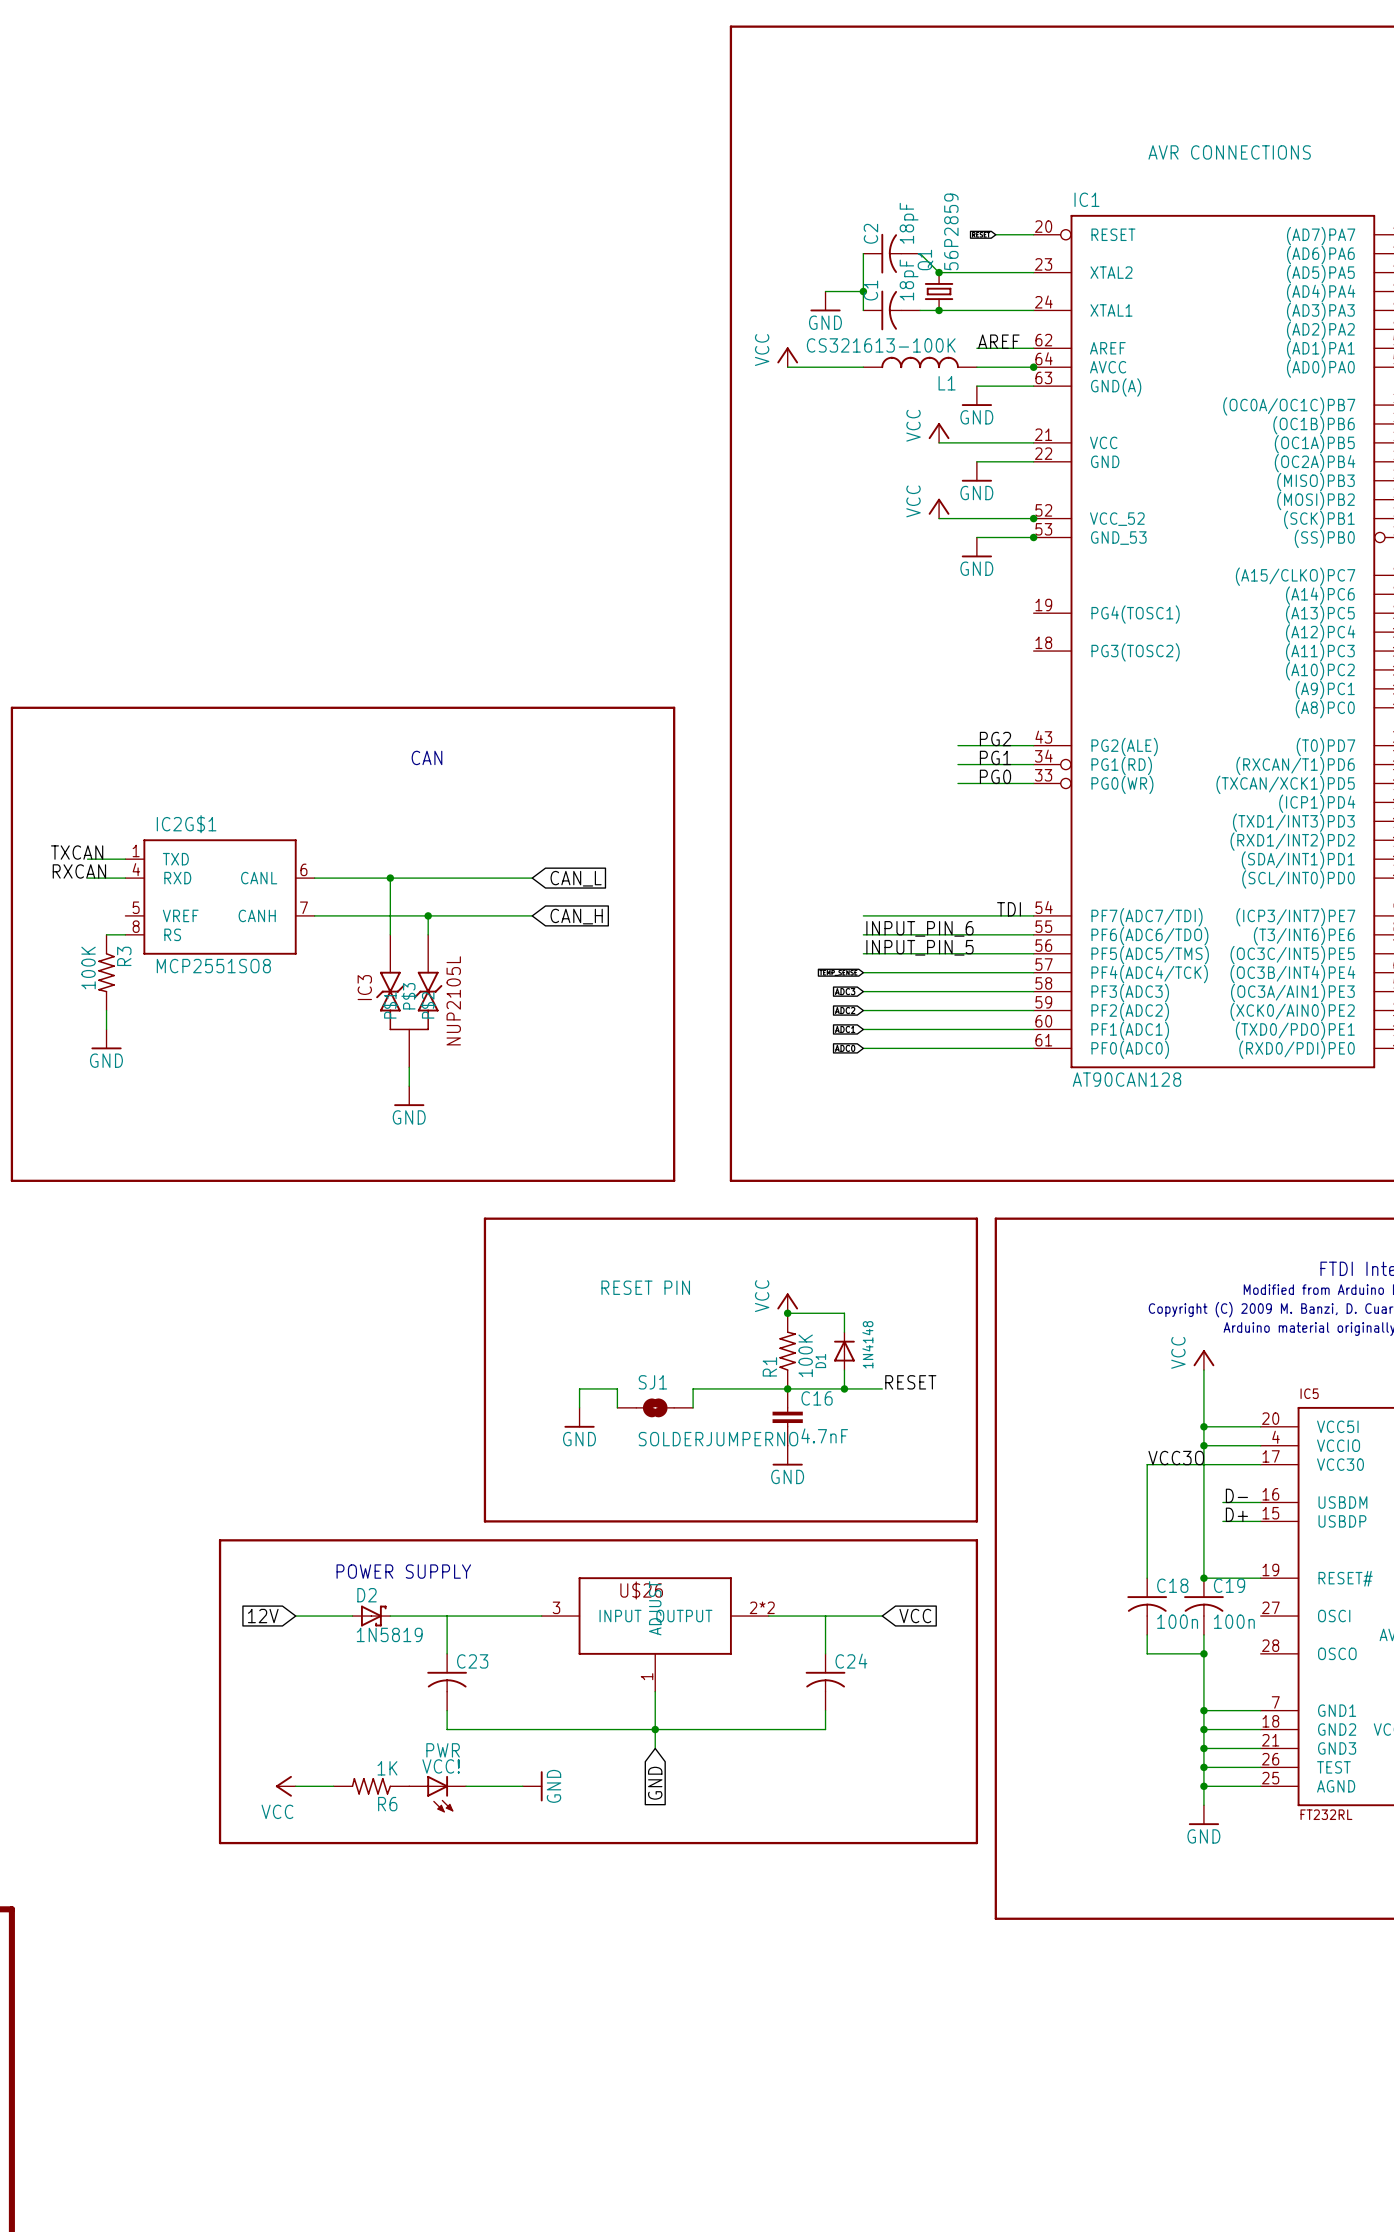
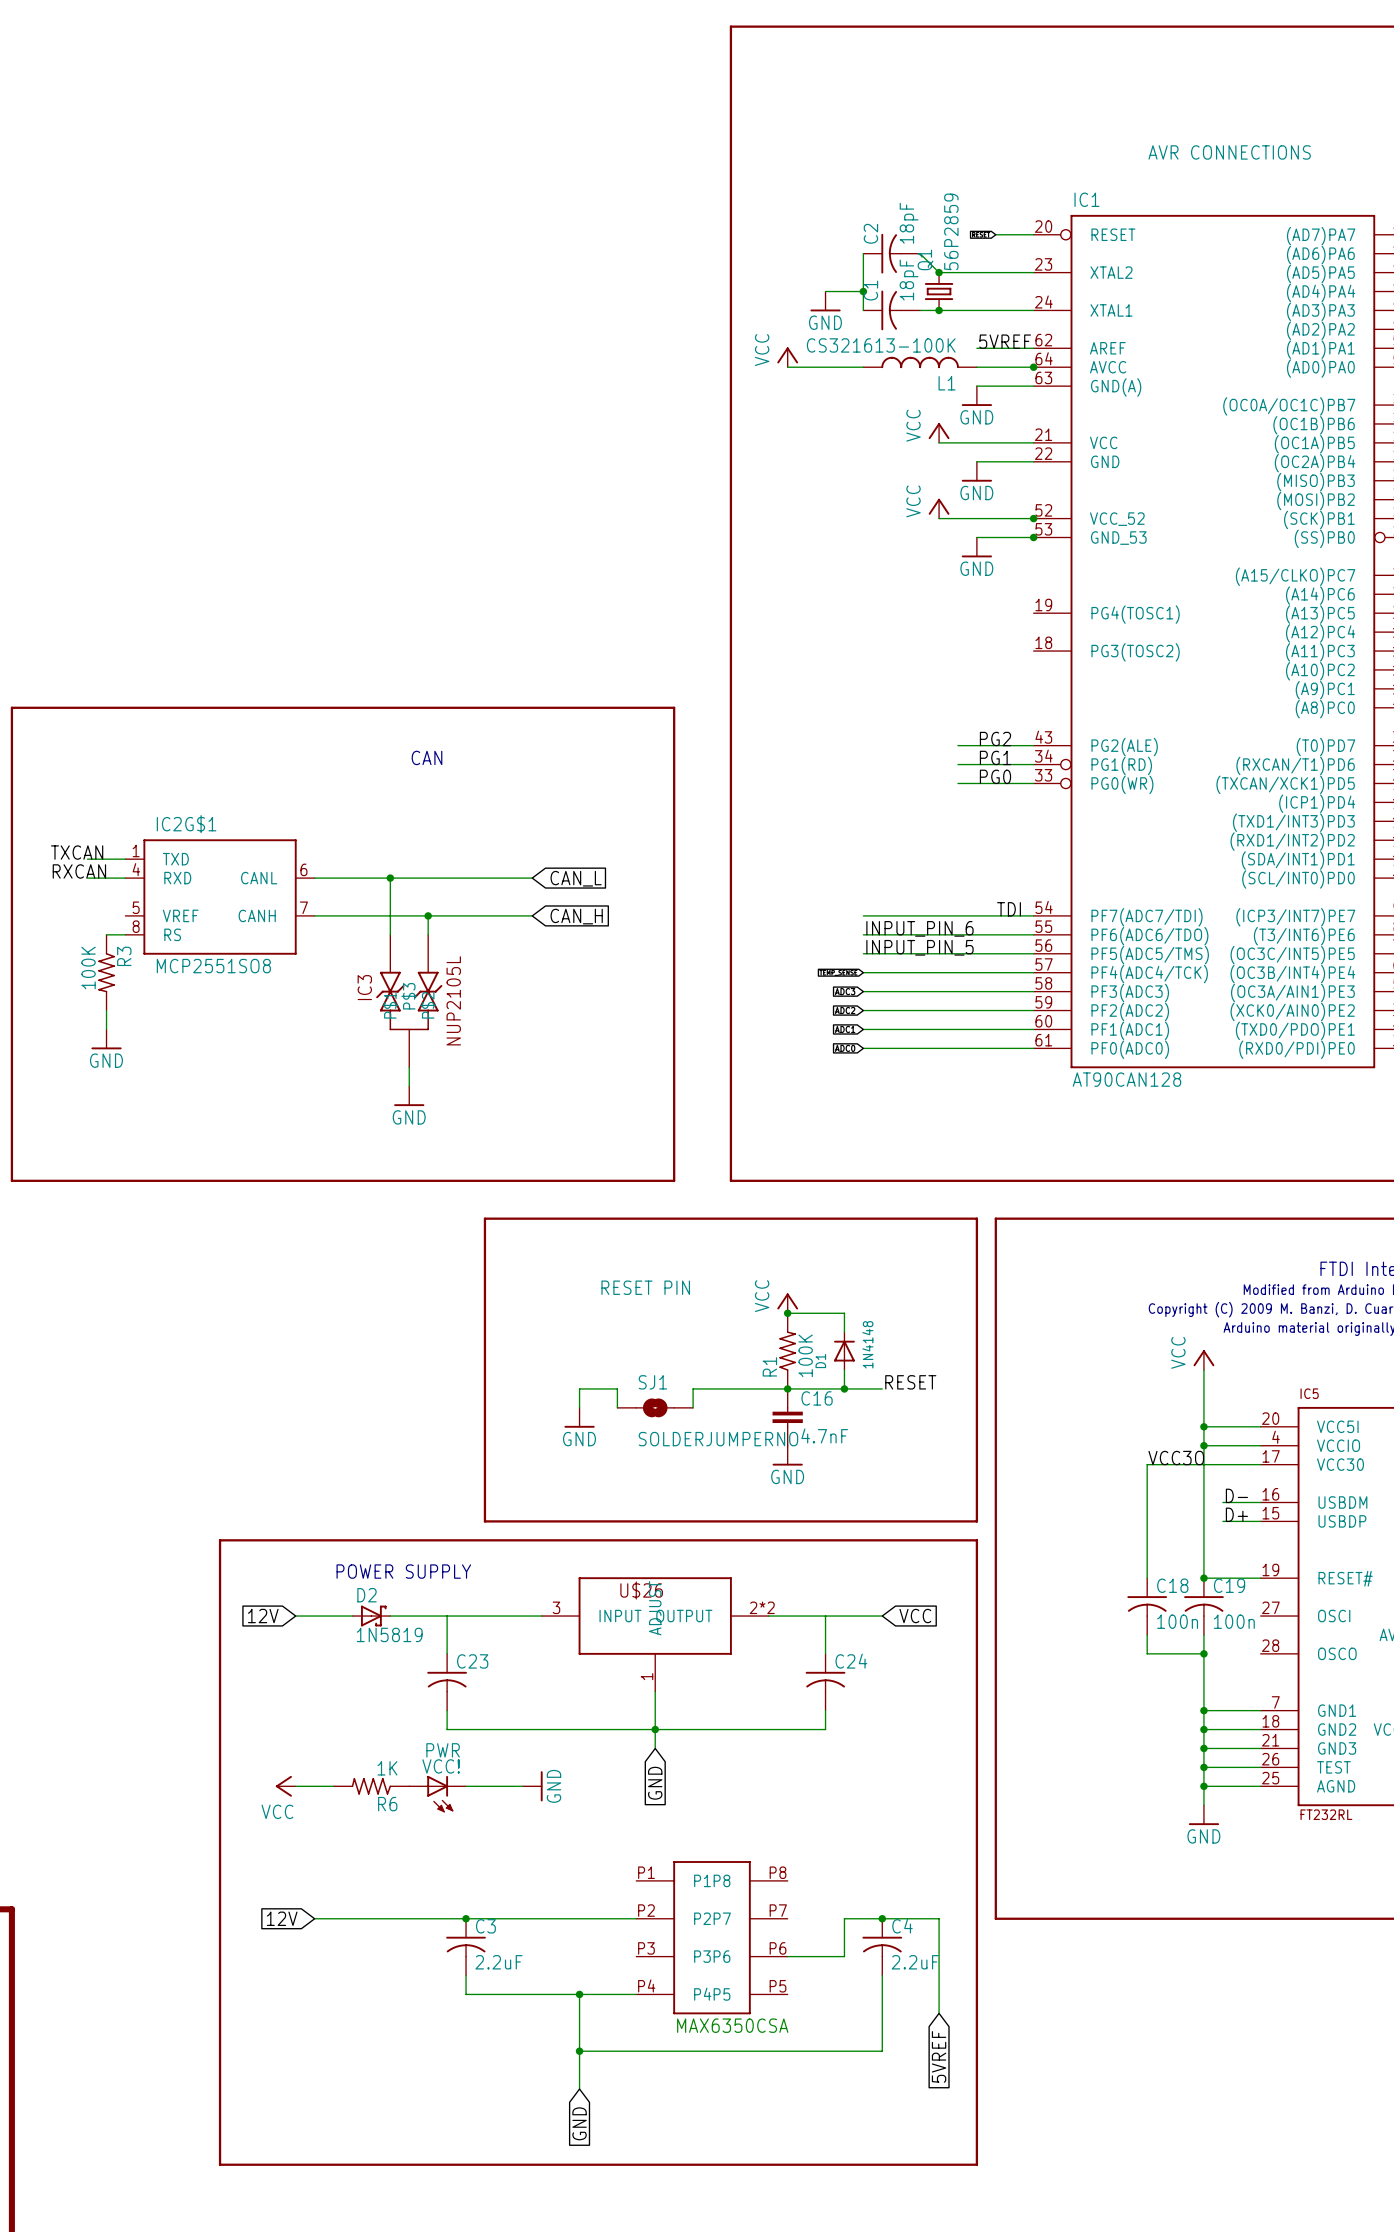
label: AREF (998, 341) -> 5VREF (1005, 341)
line: (220, 1843) (976, 1843) -> (220, 1843) (220, 2164) (976, 2164) (976, 1843)
global label: none -> 12V (282, 1918)
wire: none -> (314, 1918) (636, 1918)
junction: none -> (466, 1918)
junction: none -> (882, 1918)
part: none -> (712, 1937)
C3: none -> 2.2uF (466, 1947)
C4: none -> 2.2uF (882, 1947)
wire: none -> (787, 1956) (844, 1956) (844, 1918) (939, 1918) (939, 2013)
wire: none -> (466, 1975) (466, 1994) (636, 1994)
wire: none -> (882, 1975) (882, 2051) (579, 2051)
wire: none -> (579, 1994) (579, 2089)
junction: none -> (579, 1994)
text: none -> MAX6350CSA (732, 2025)
junction: none -> (579, 2051)
global label: none -> 5VREF (939, 2056)
global label: none -> GND (579, 2123)

